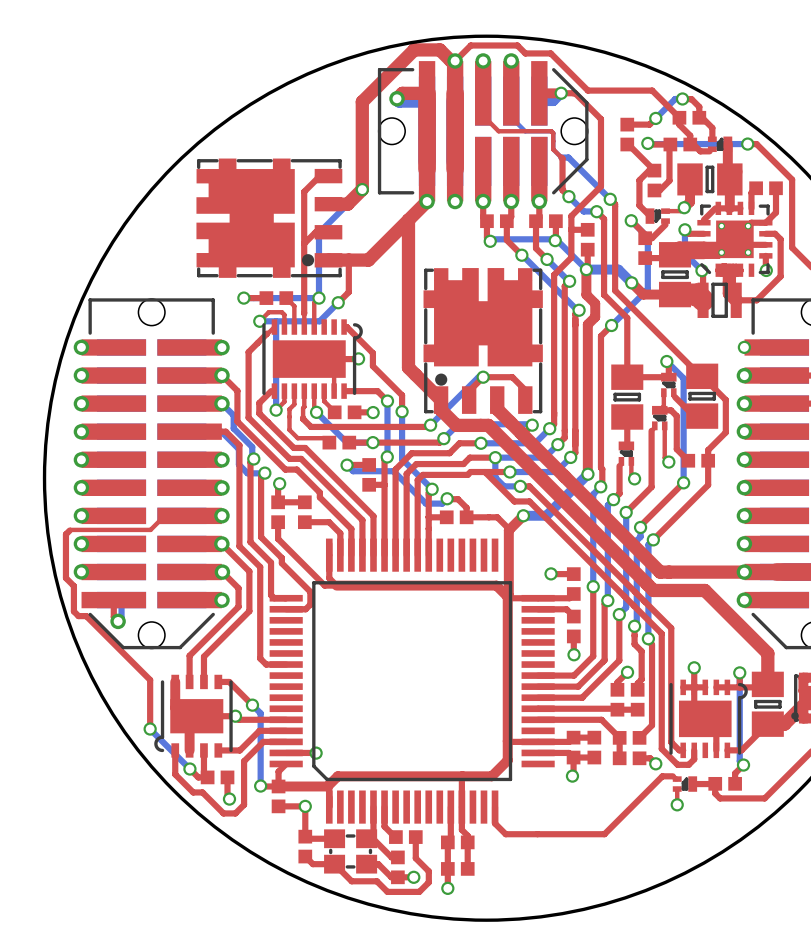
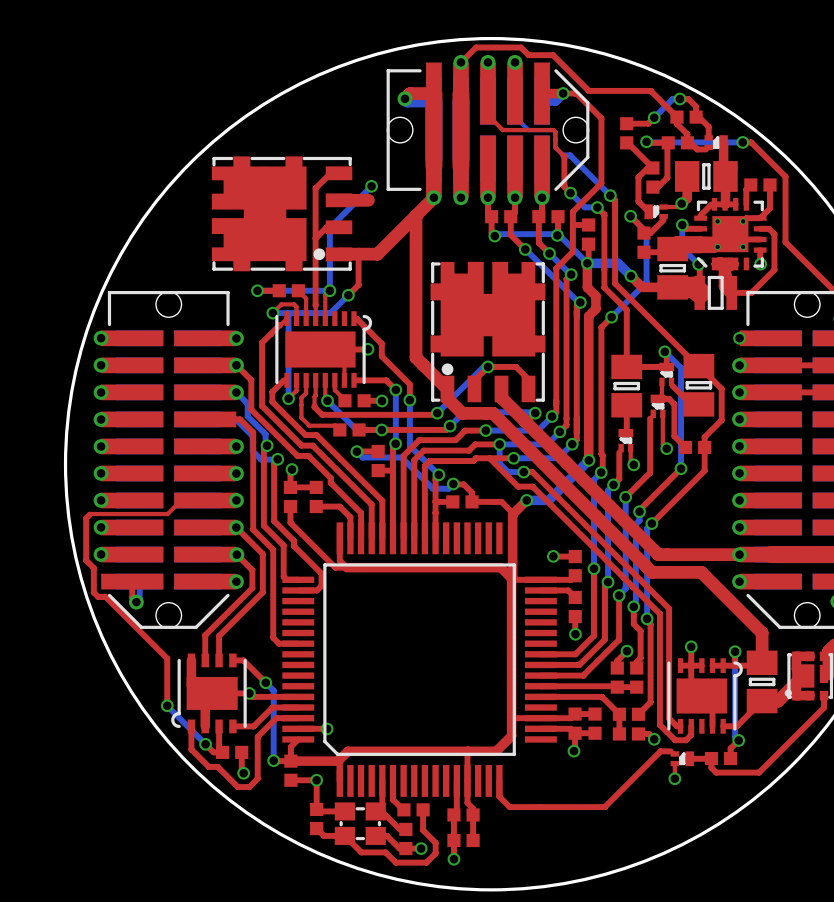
top track: (455, 60) (450, 60) (439, 49) (414, 49) (362, 101) (362, 189) (347, 204) -> (368, 200) (357, 200)

